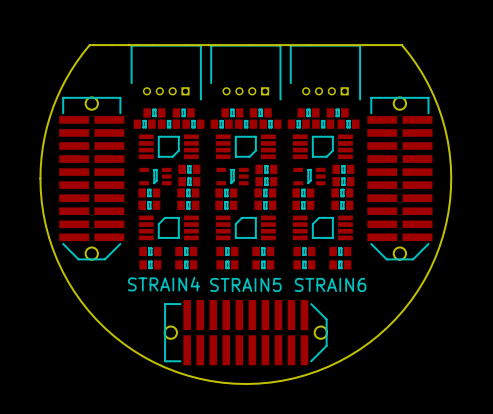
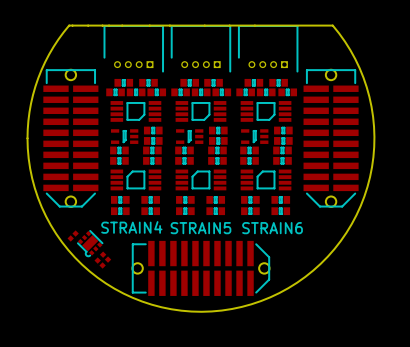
part: none -> (73, 236)
part: none -> (90, 243)
part: none -> (105, 257)
part: none -> (100, 263)

